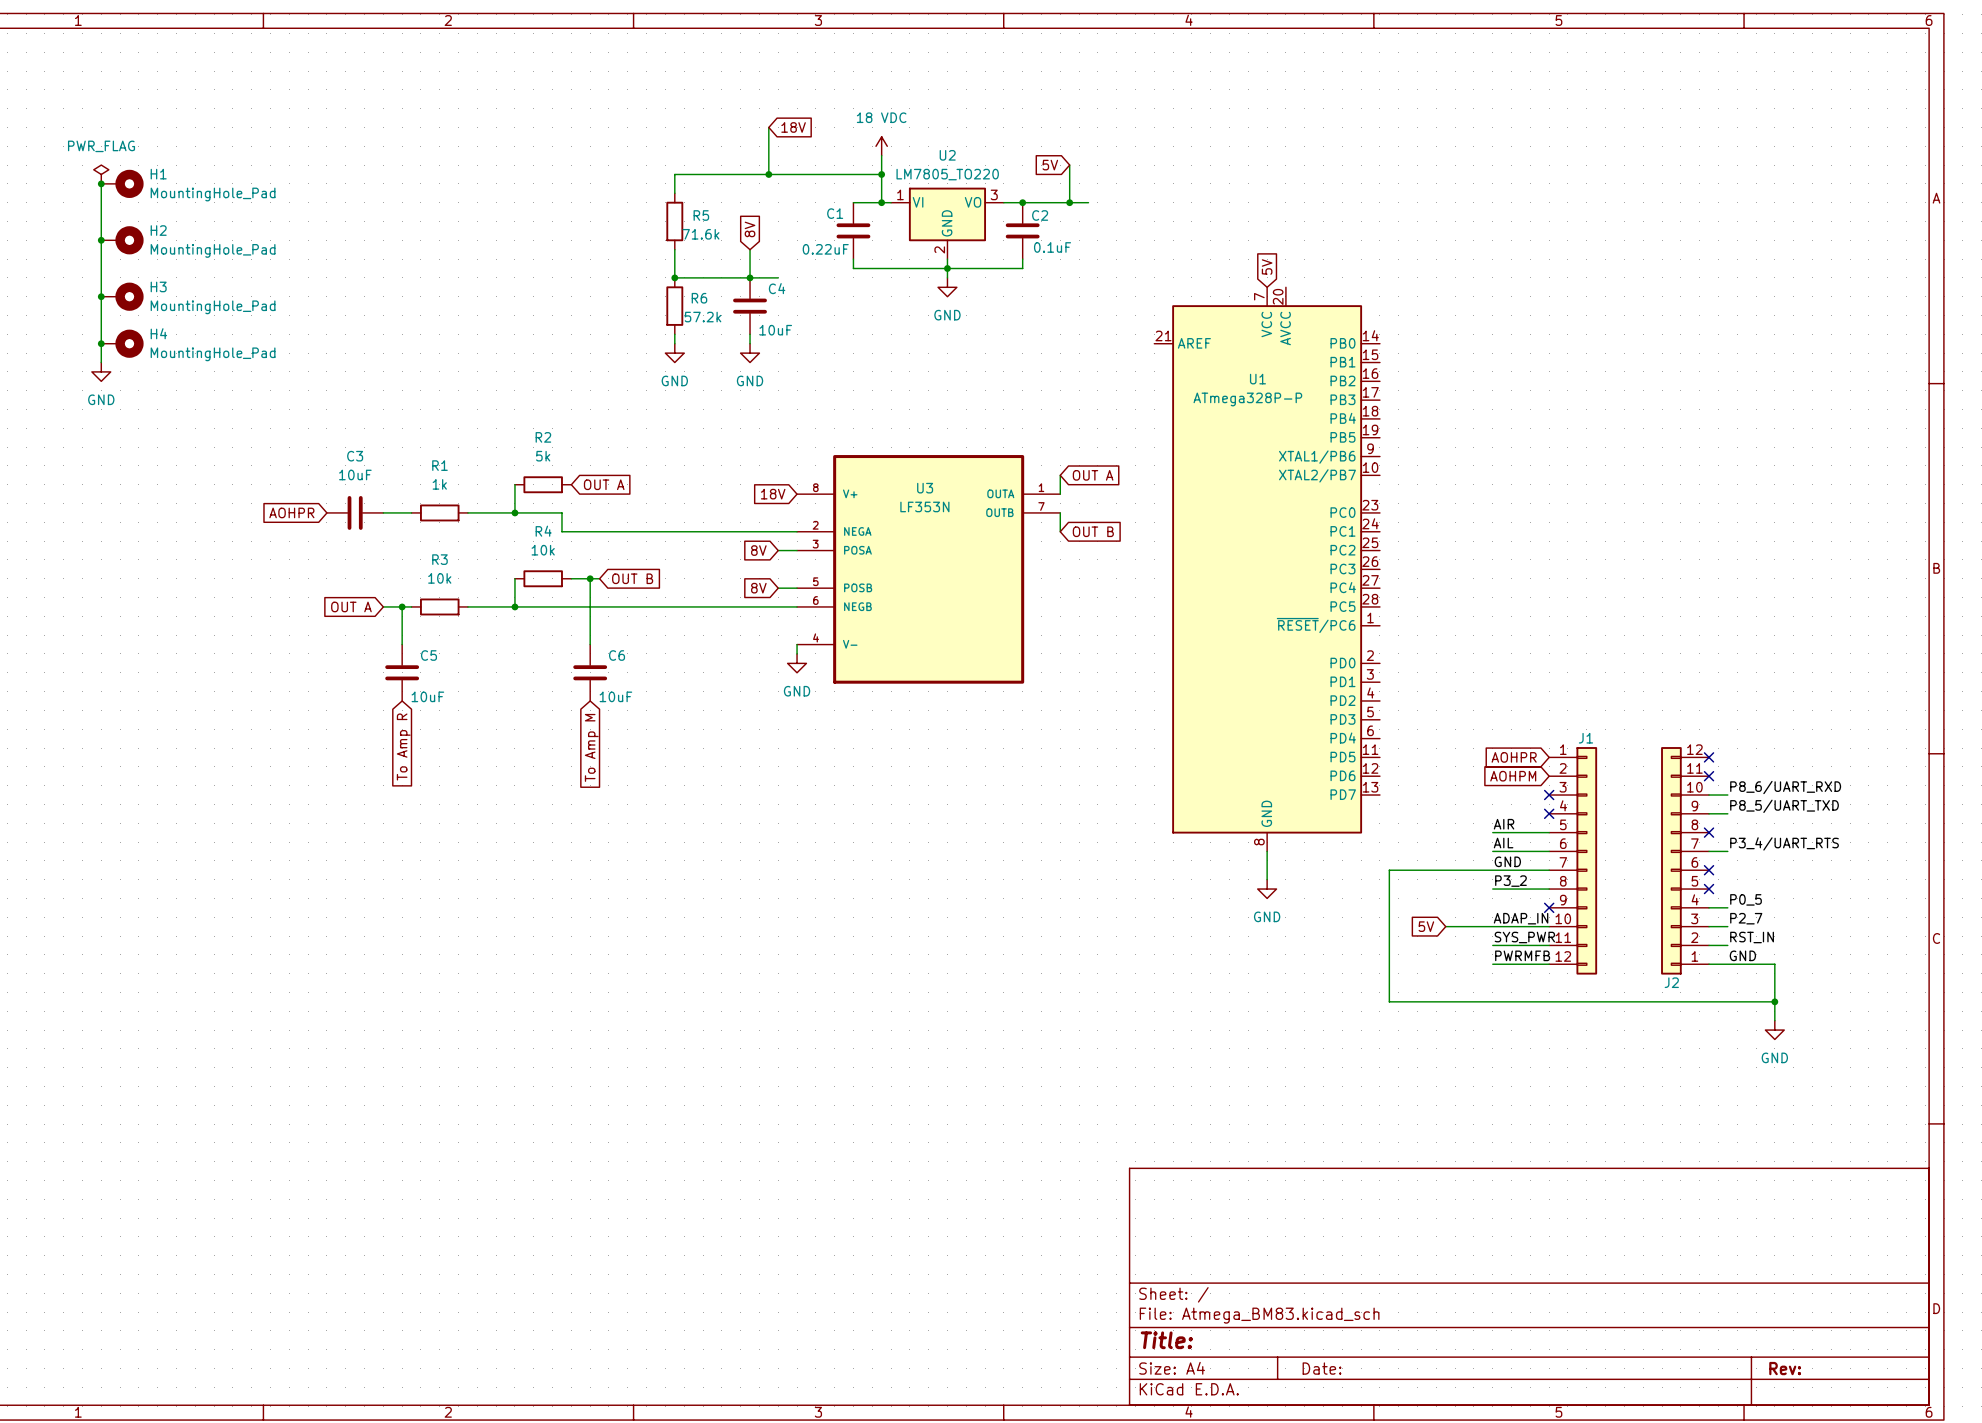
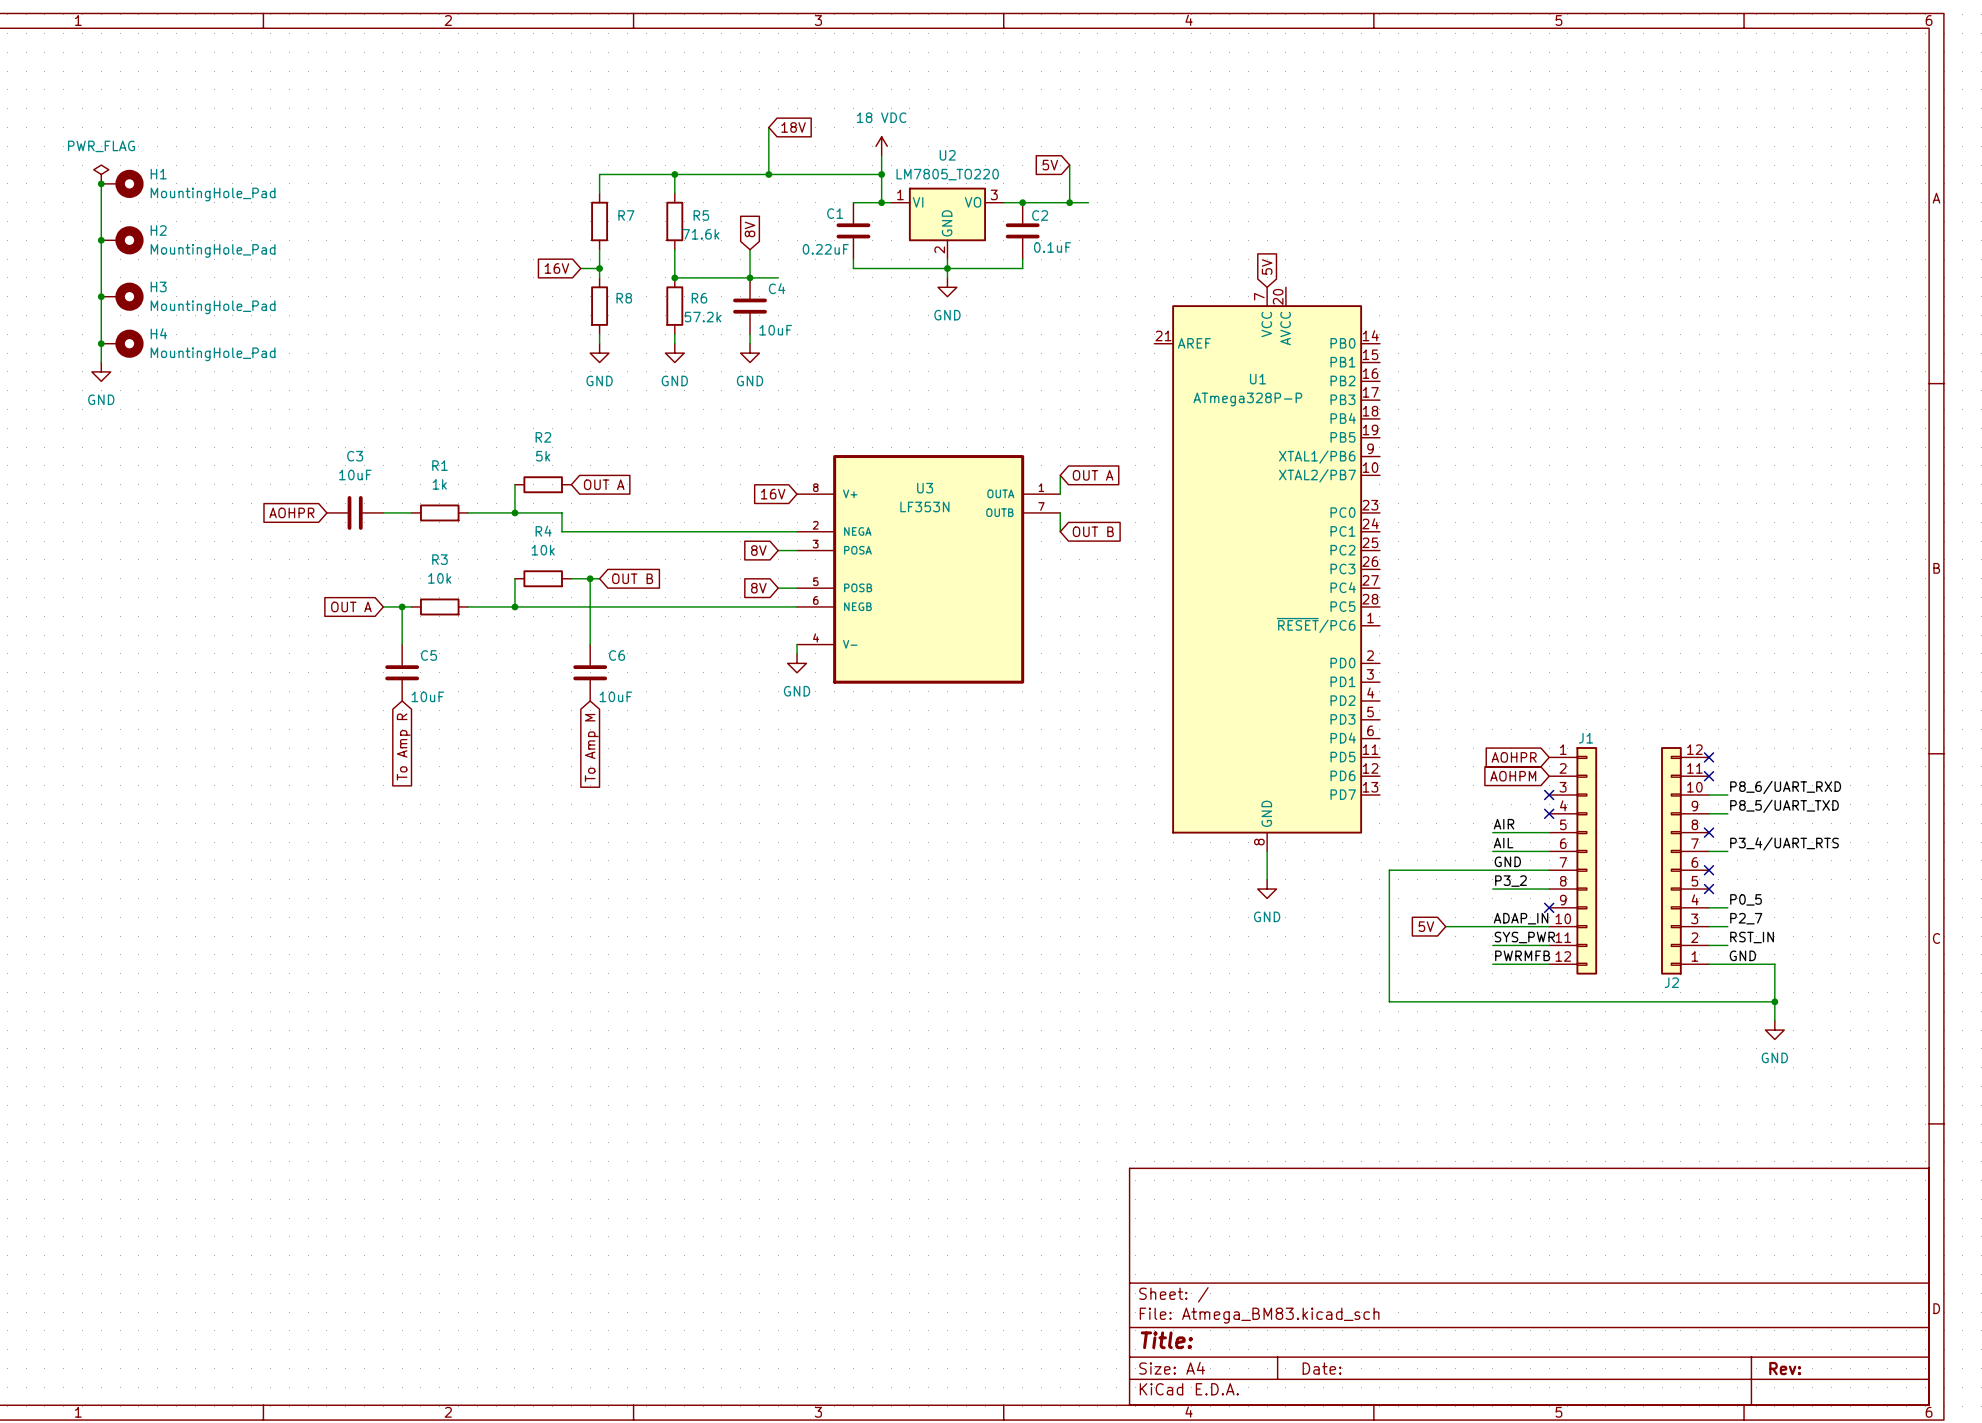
wire: none -> (674, 174) (599, 174) (599, 193)
junction: none -> (674, 174)
R7: none -> (599, 221)
wire: none -> (599, 249) (599, 277)
global label: none -> 16V (556, 268)
wire: none -> (580, 268) (599, 268)
junction: none -> (599, 268)
R8: none -> (599, 306)
wire: none -> (599, 334) (599, 343)
power symbol: none -> GND (599, 353)
global label: 18V (773, 494) -> 16V (773, 494)

